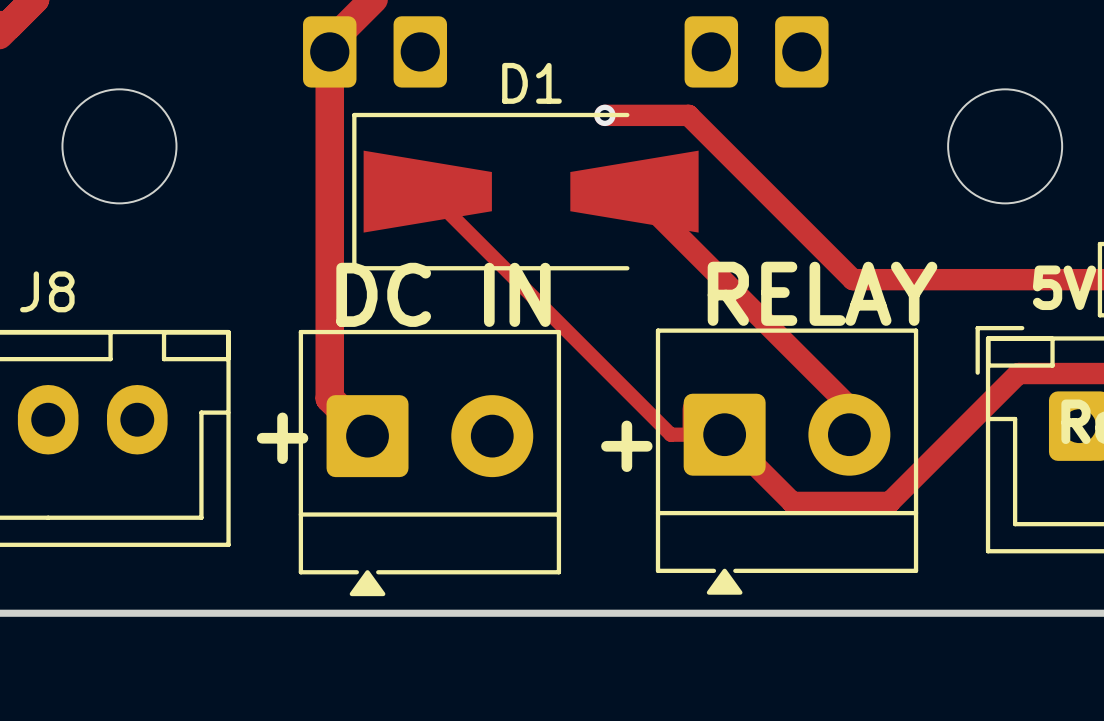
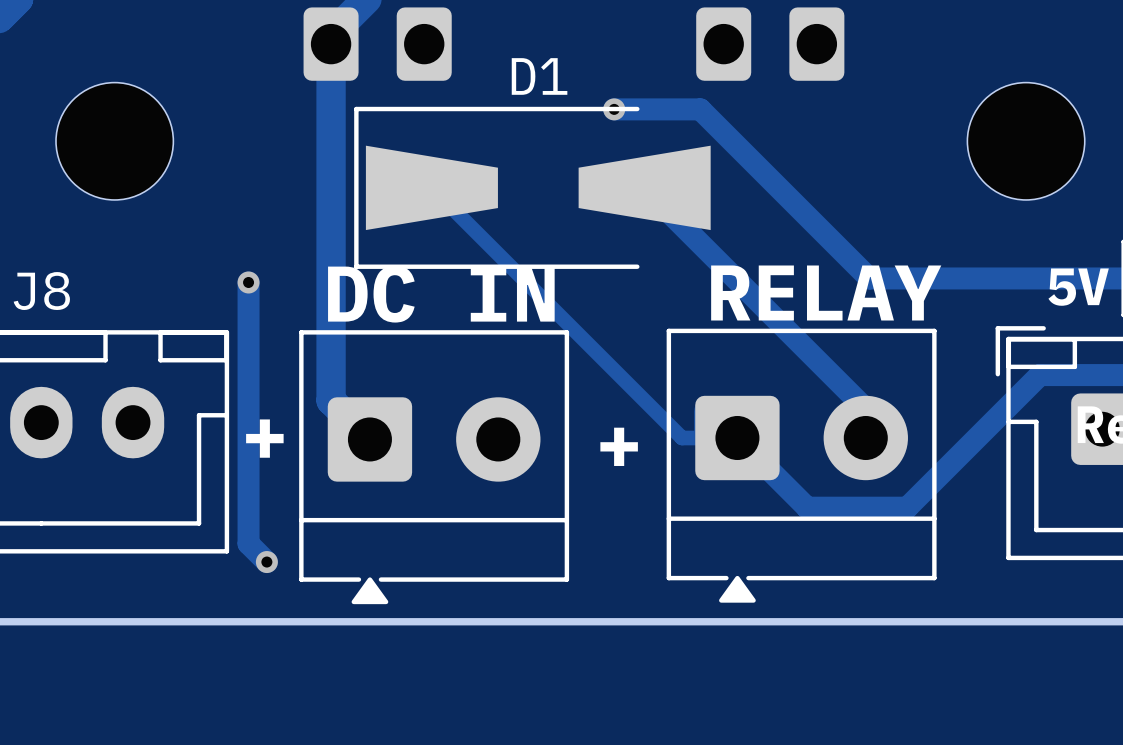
track: none -> (248, 282) (248, 543) (266, 562)
via: none -> (248, 282)
via: none -> (266, 562)

